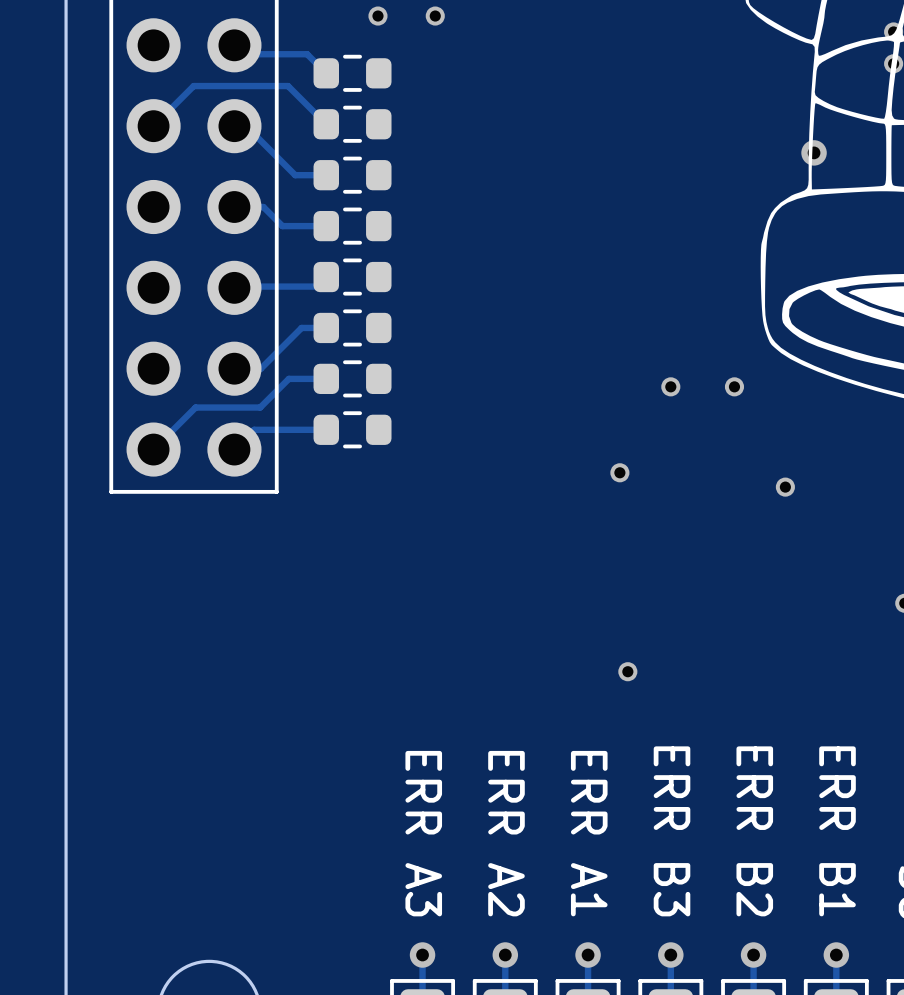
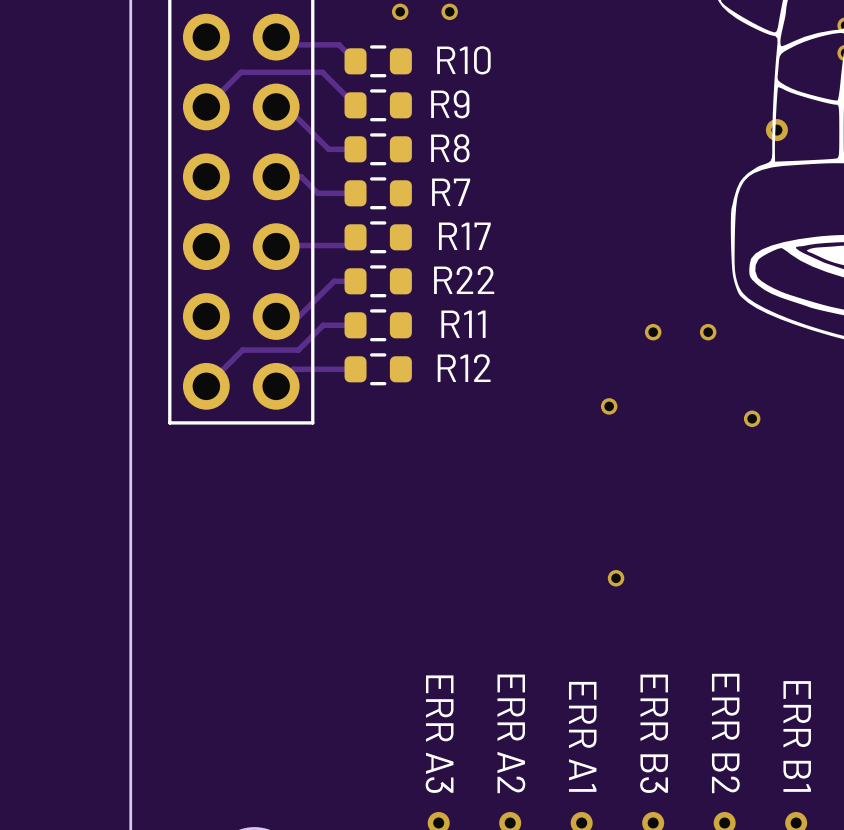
R10 name: none -> R10 (463, 60)
R9 name: none -> R9 (450, 104)
R8 name: none -> R8 (450, 148)
R7 name: none -> R7 (451, 192)
R17 name: none -> R17 (464, 236)
R22 name: none -> R22 (464, 280)
R11 name: none -> R11 (463, 324)
R12 name: none -> R12 (464, 368)

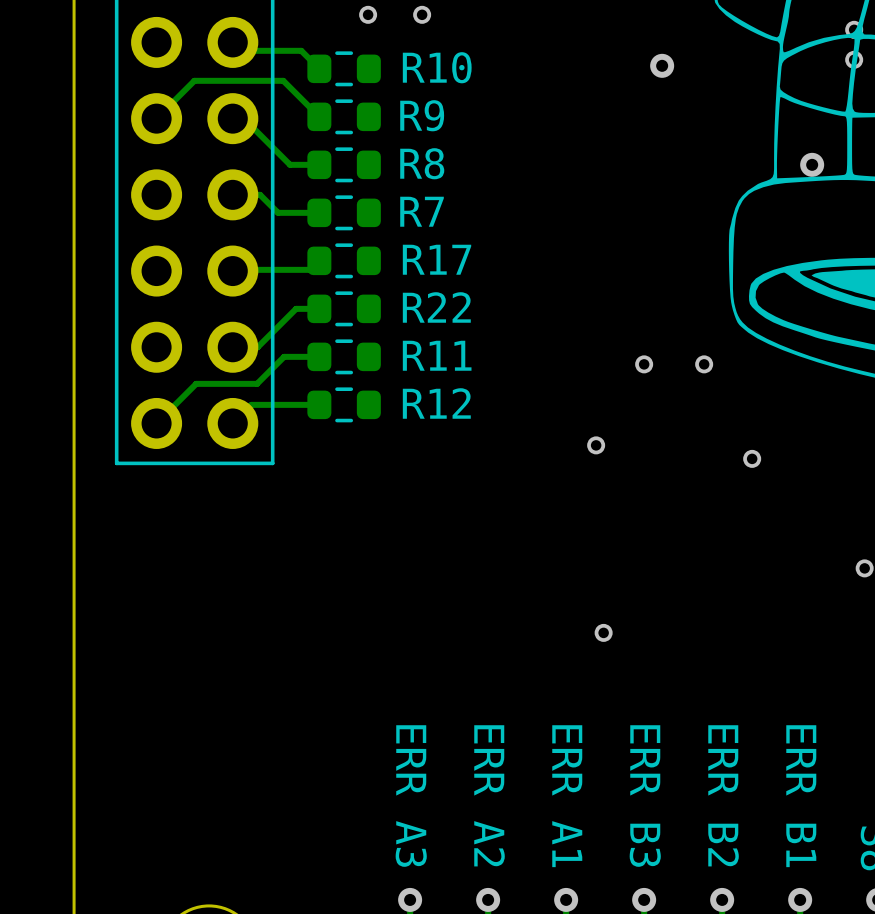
via: none -> (662, 65)
via position: (776, 130) -> (812, 164)

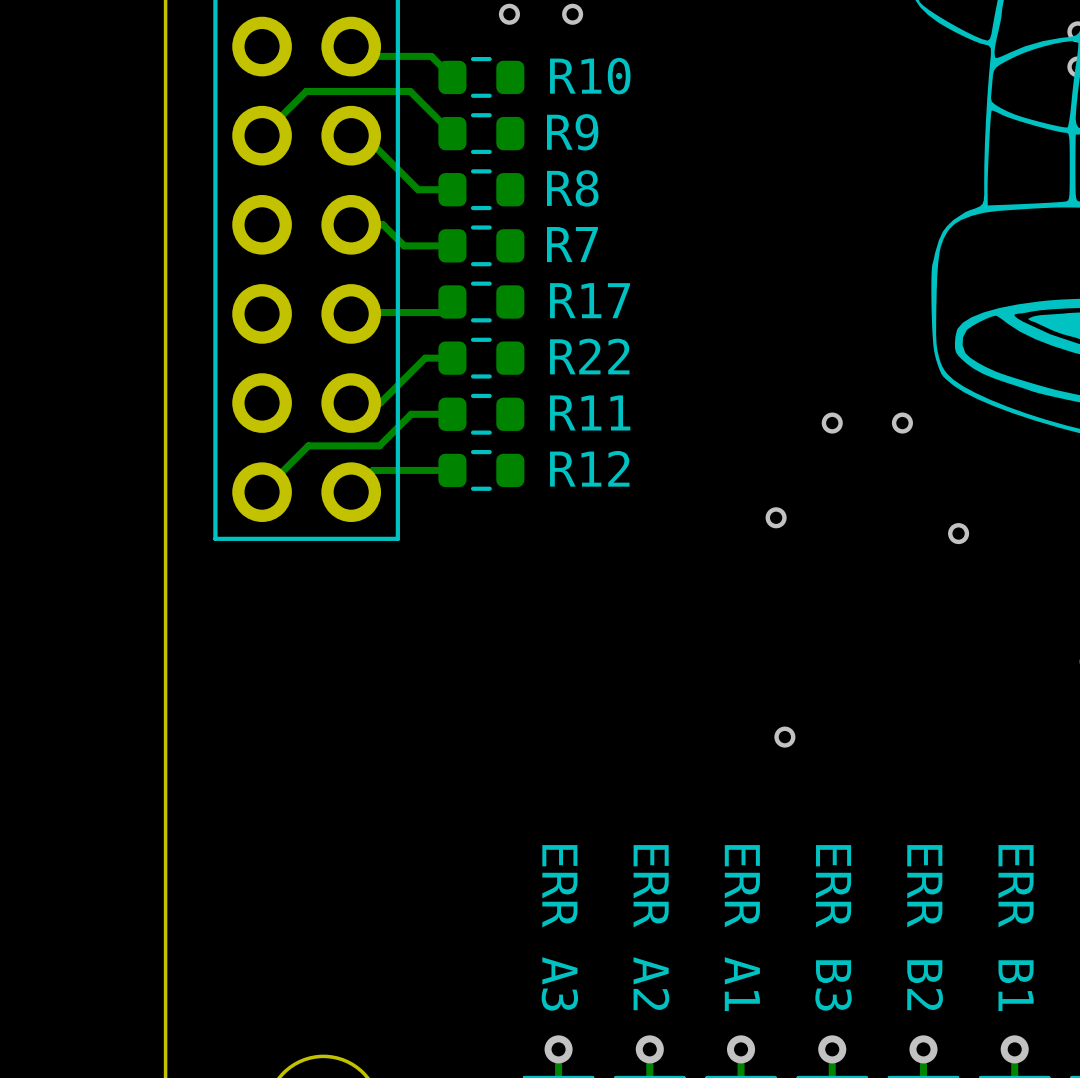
via: (662, 65) -> none
via: (812, 164) -> none

